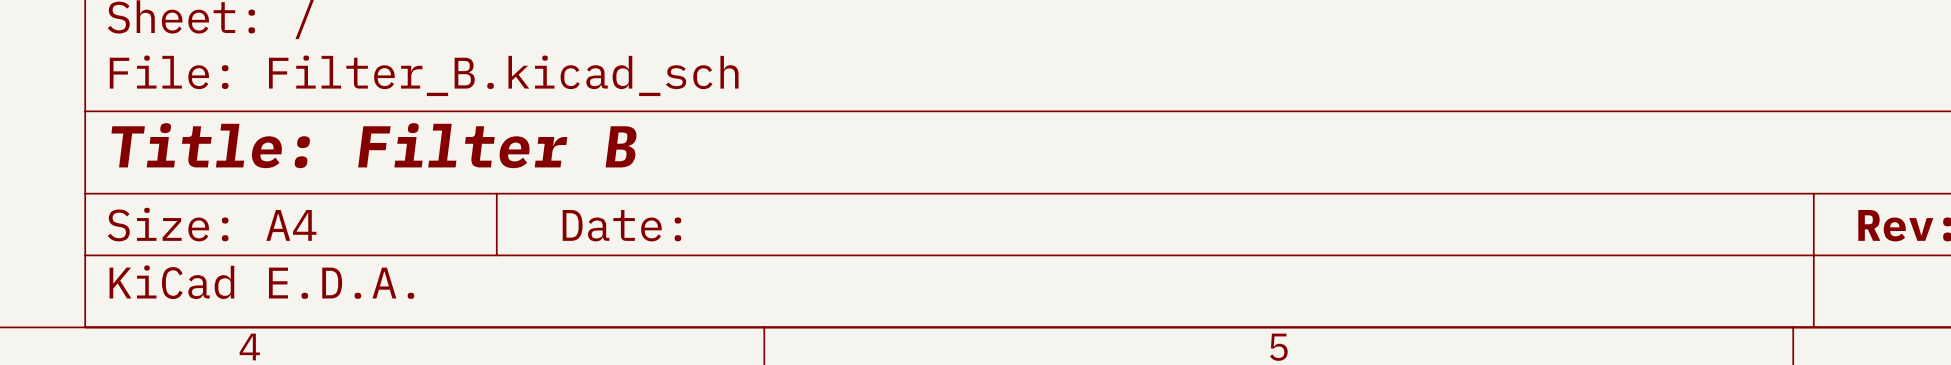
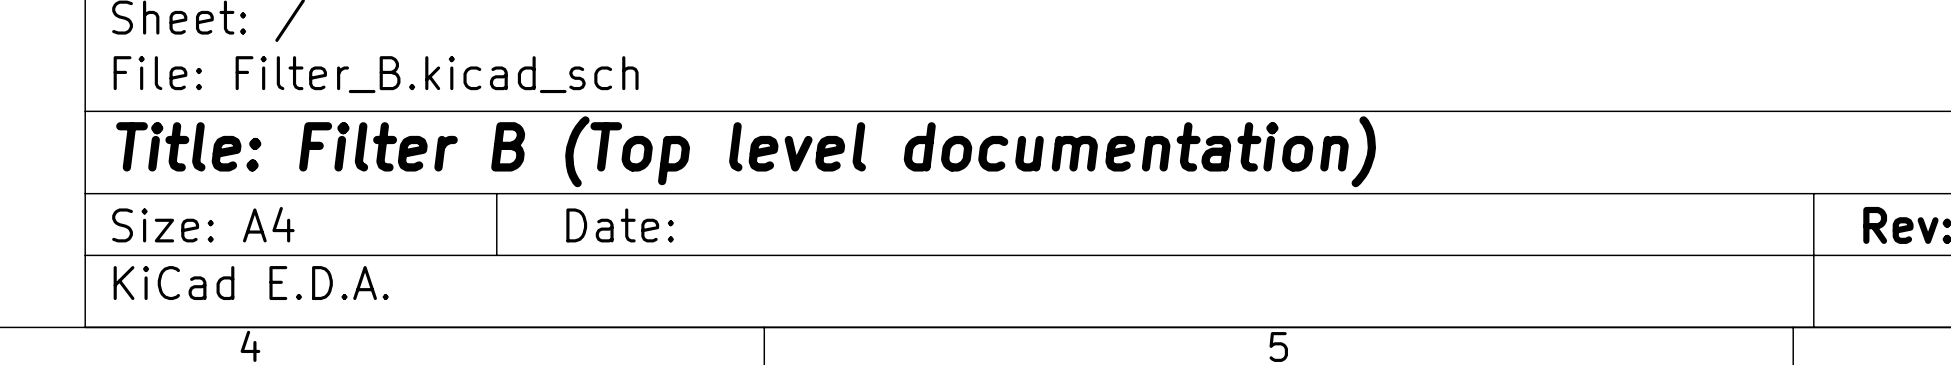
title block: Title: Filter B (374, 145) -> Title: Filter B (Top level documentation) (746, 151)

